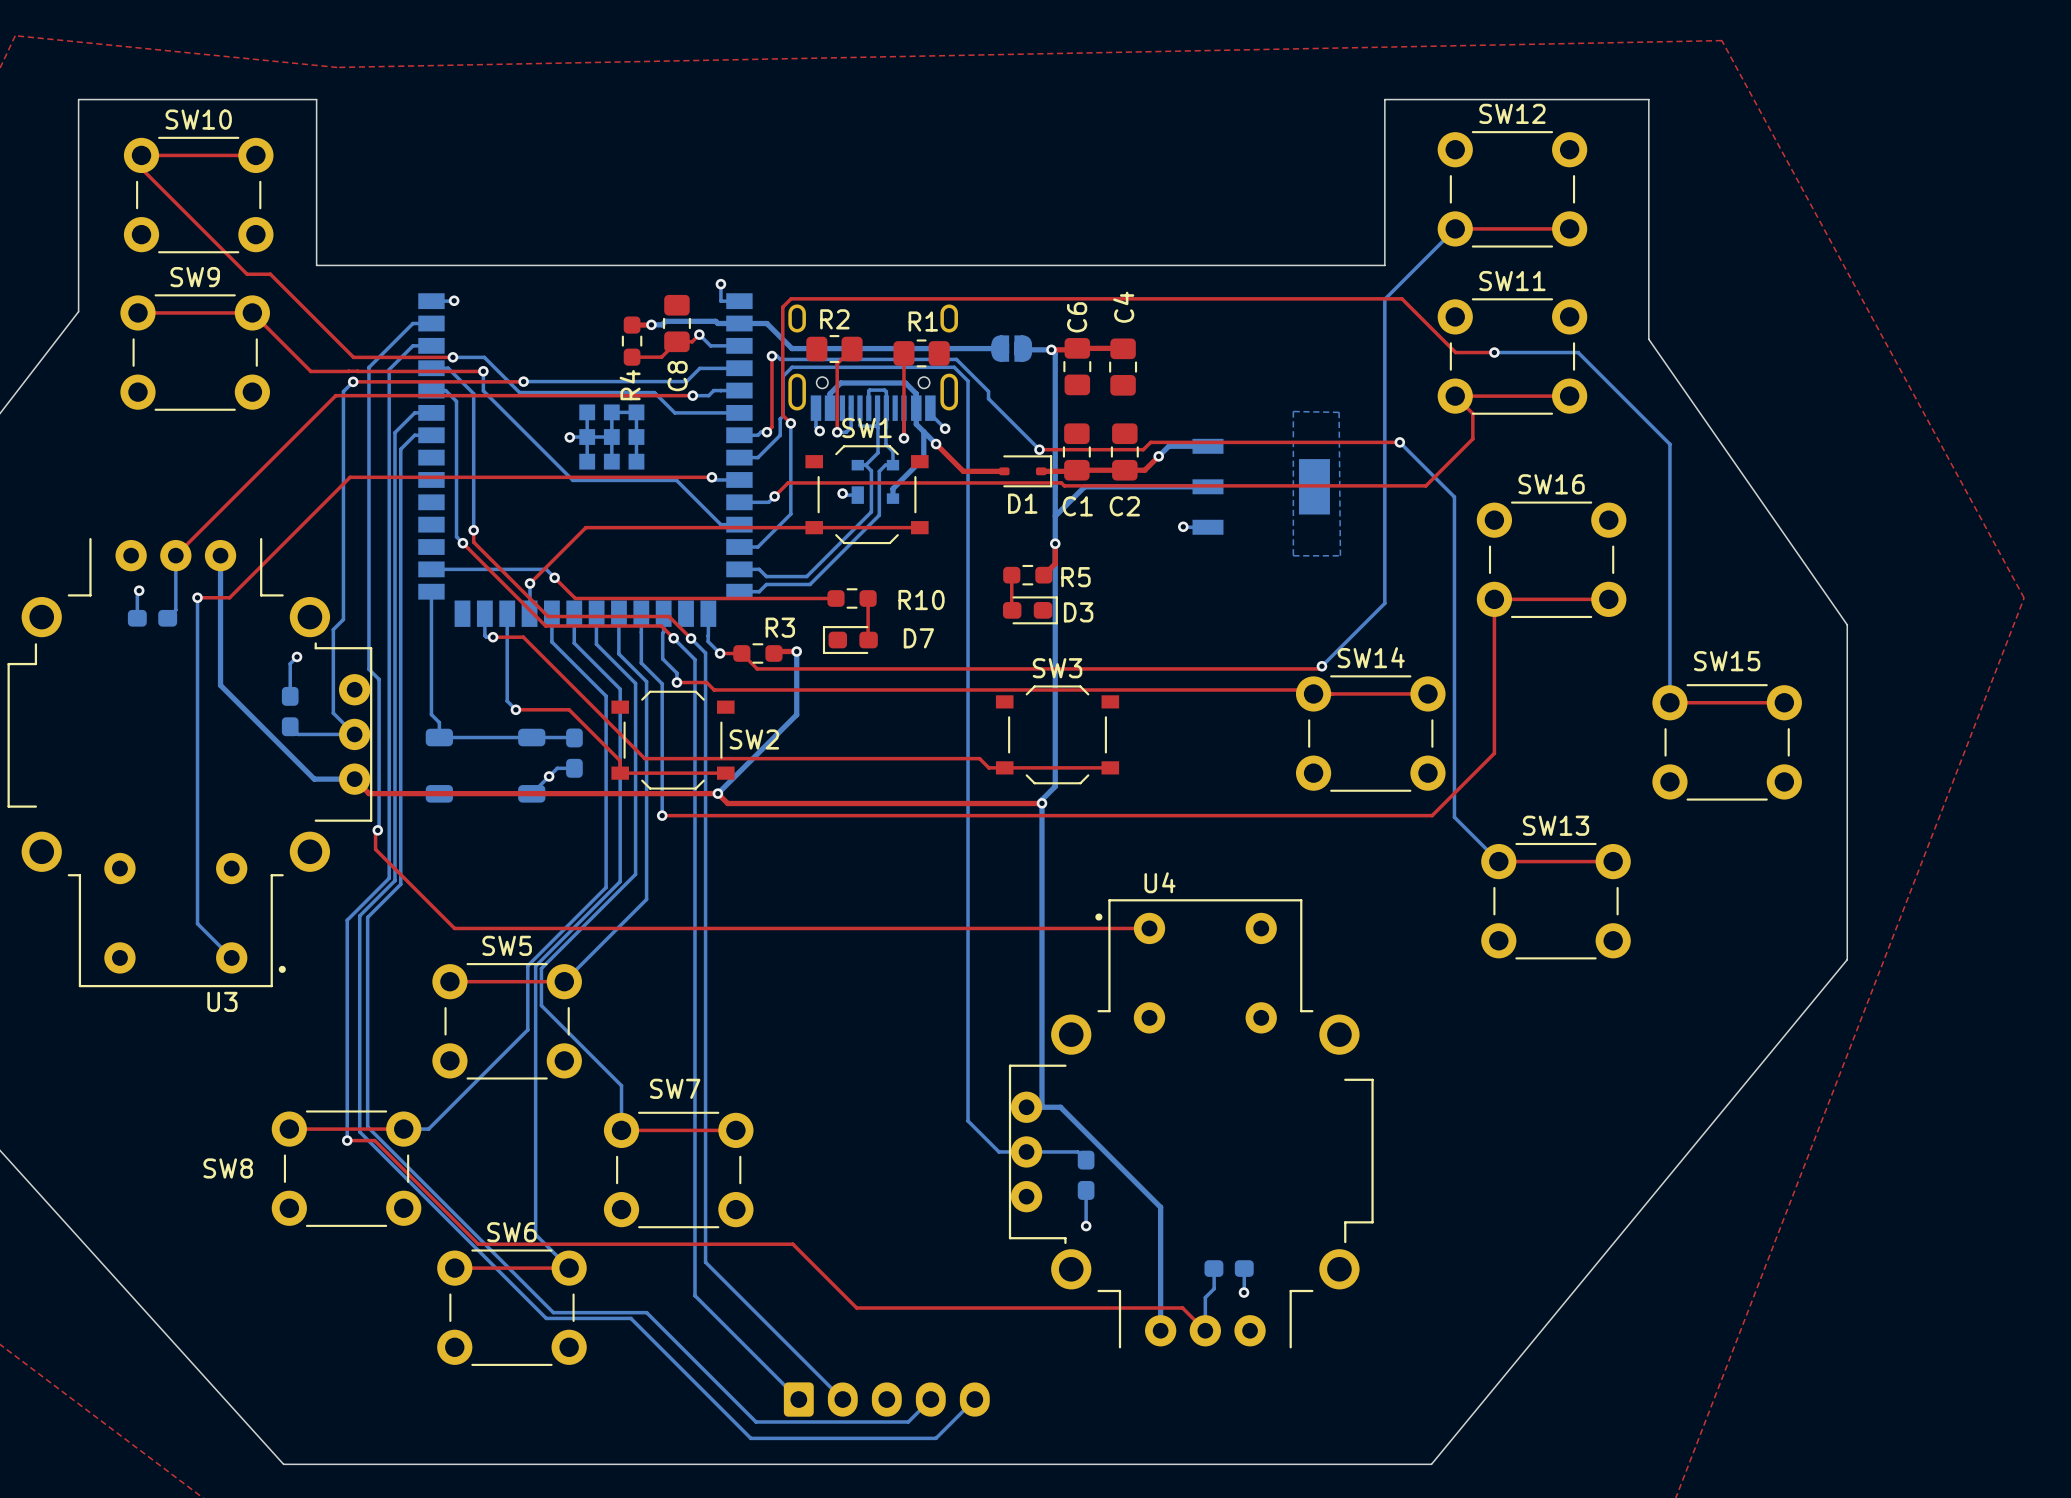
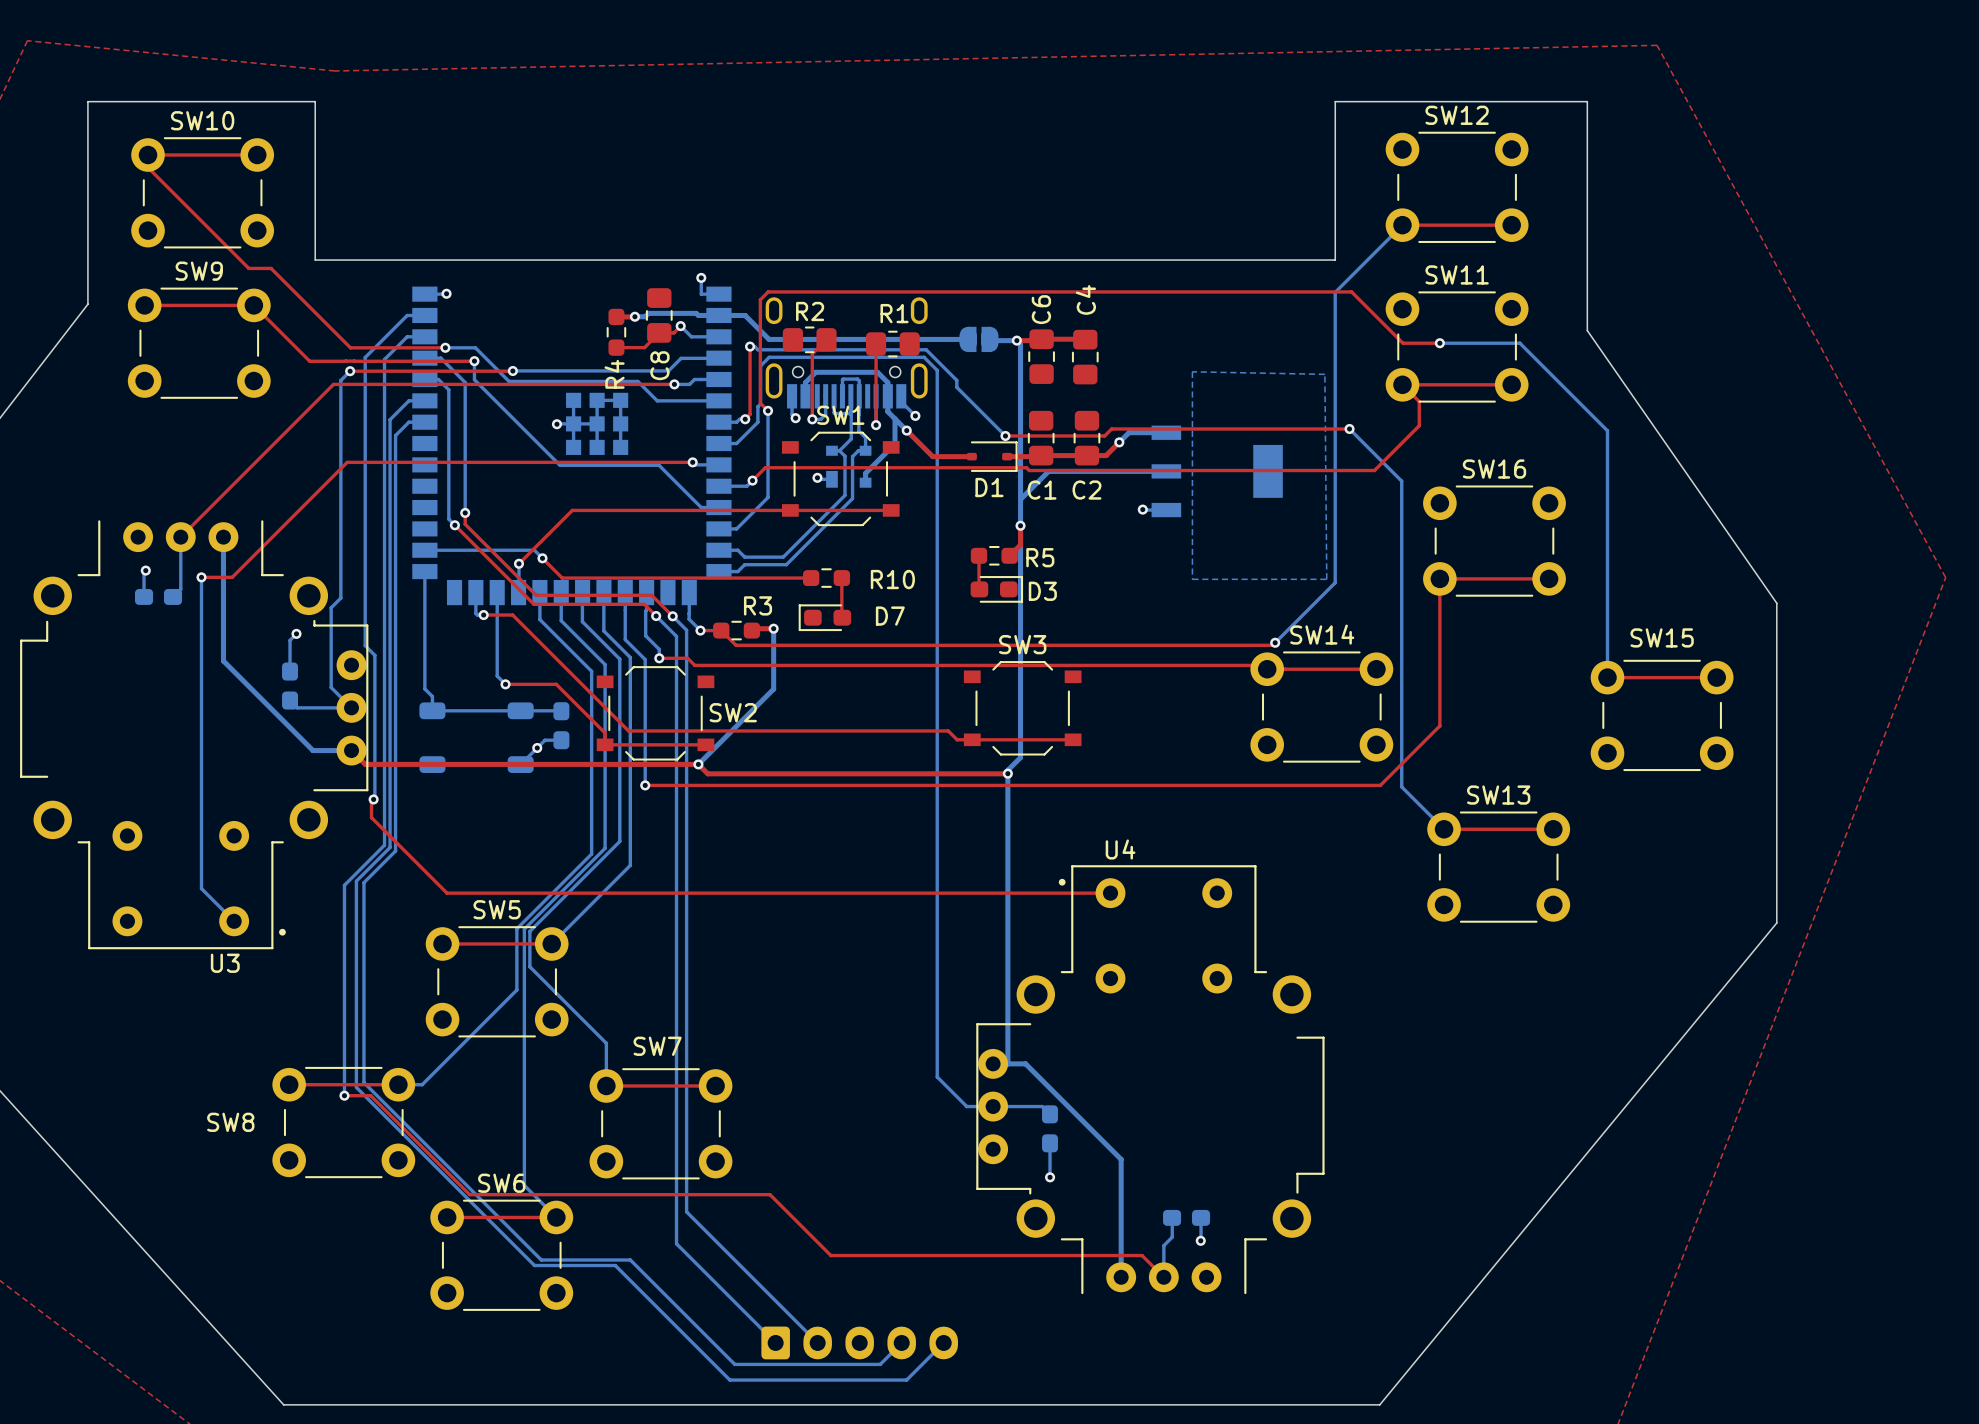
bottom zone outline: none -> (1192, 371) (1192, 579) (1326, 579) (1324, 374) (1192, 371)
bottom zone outline: (1293, 411) (1293, 555) (1340, 555) (1339, 412) (1293, 411) -> none

